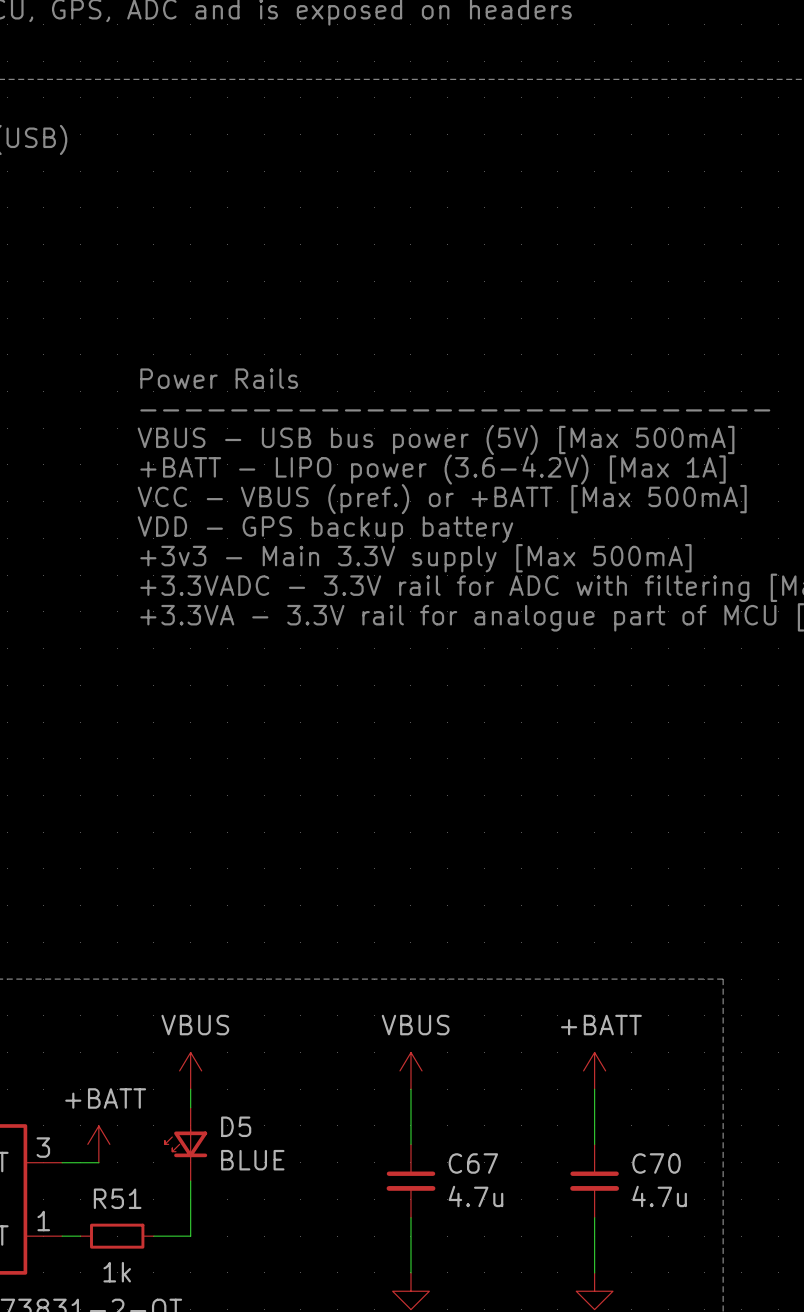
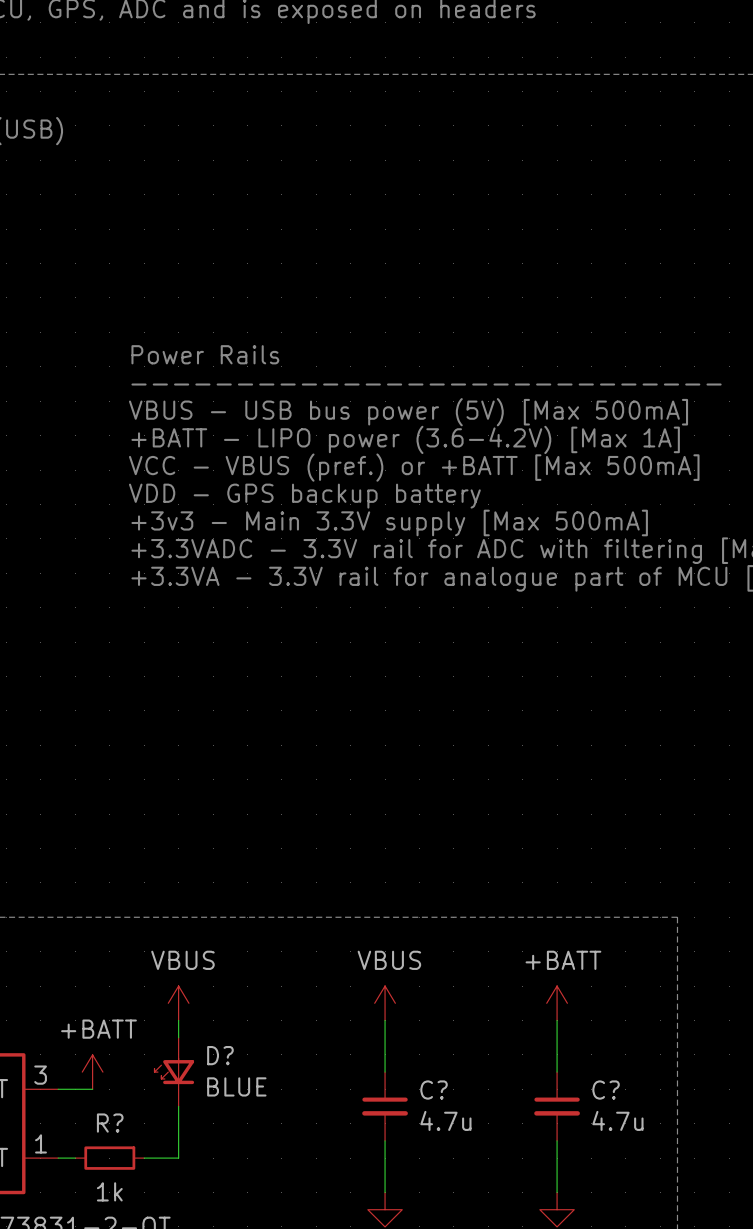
D5 name: D5 (236, 1126) -> D? (220, 1055)
C67 name: C67 (473, 1163) -> C? (434, 1090)
C70 name: C70 (656, 1163) -> C? (606, 1090)
R51 name: R51 (117, 1198) -> R? (110, 1123)

